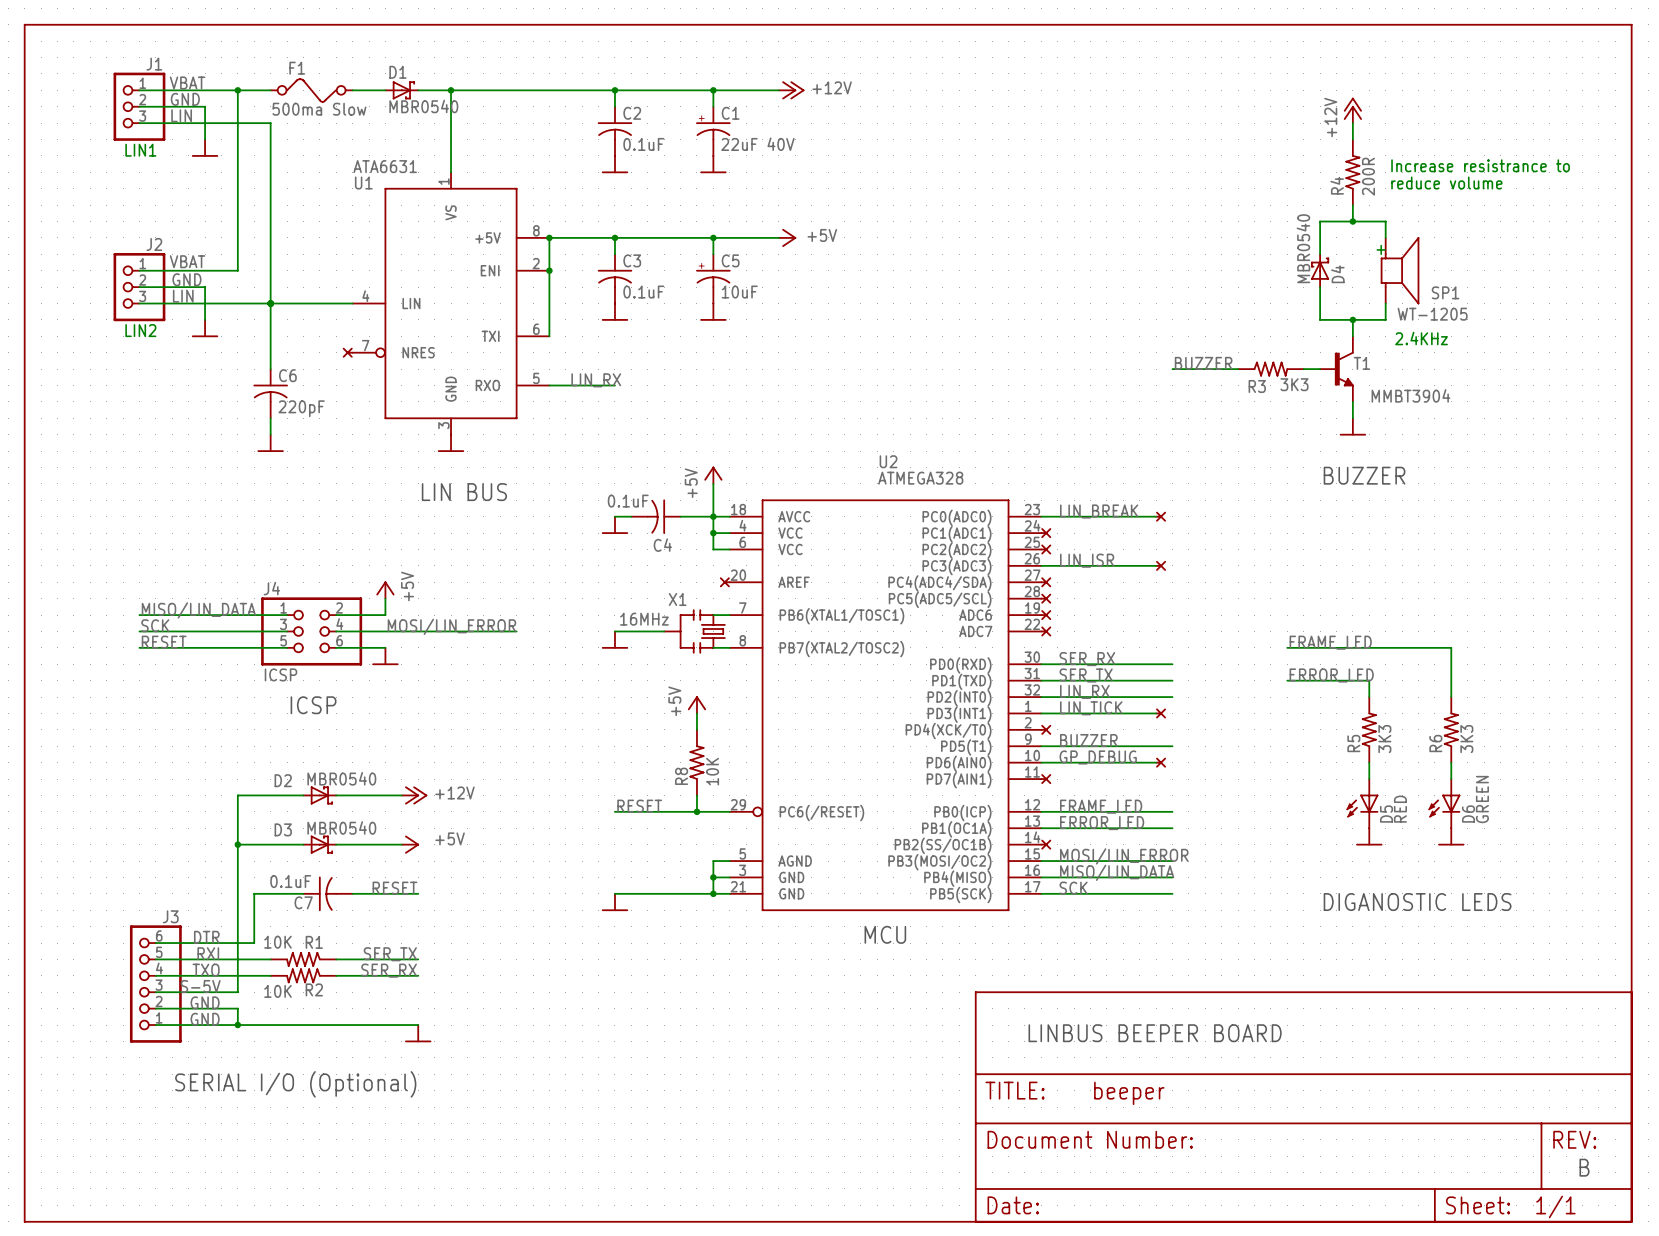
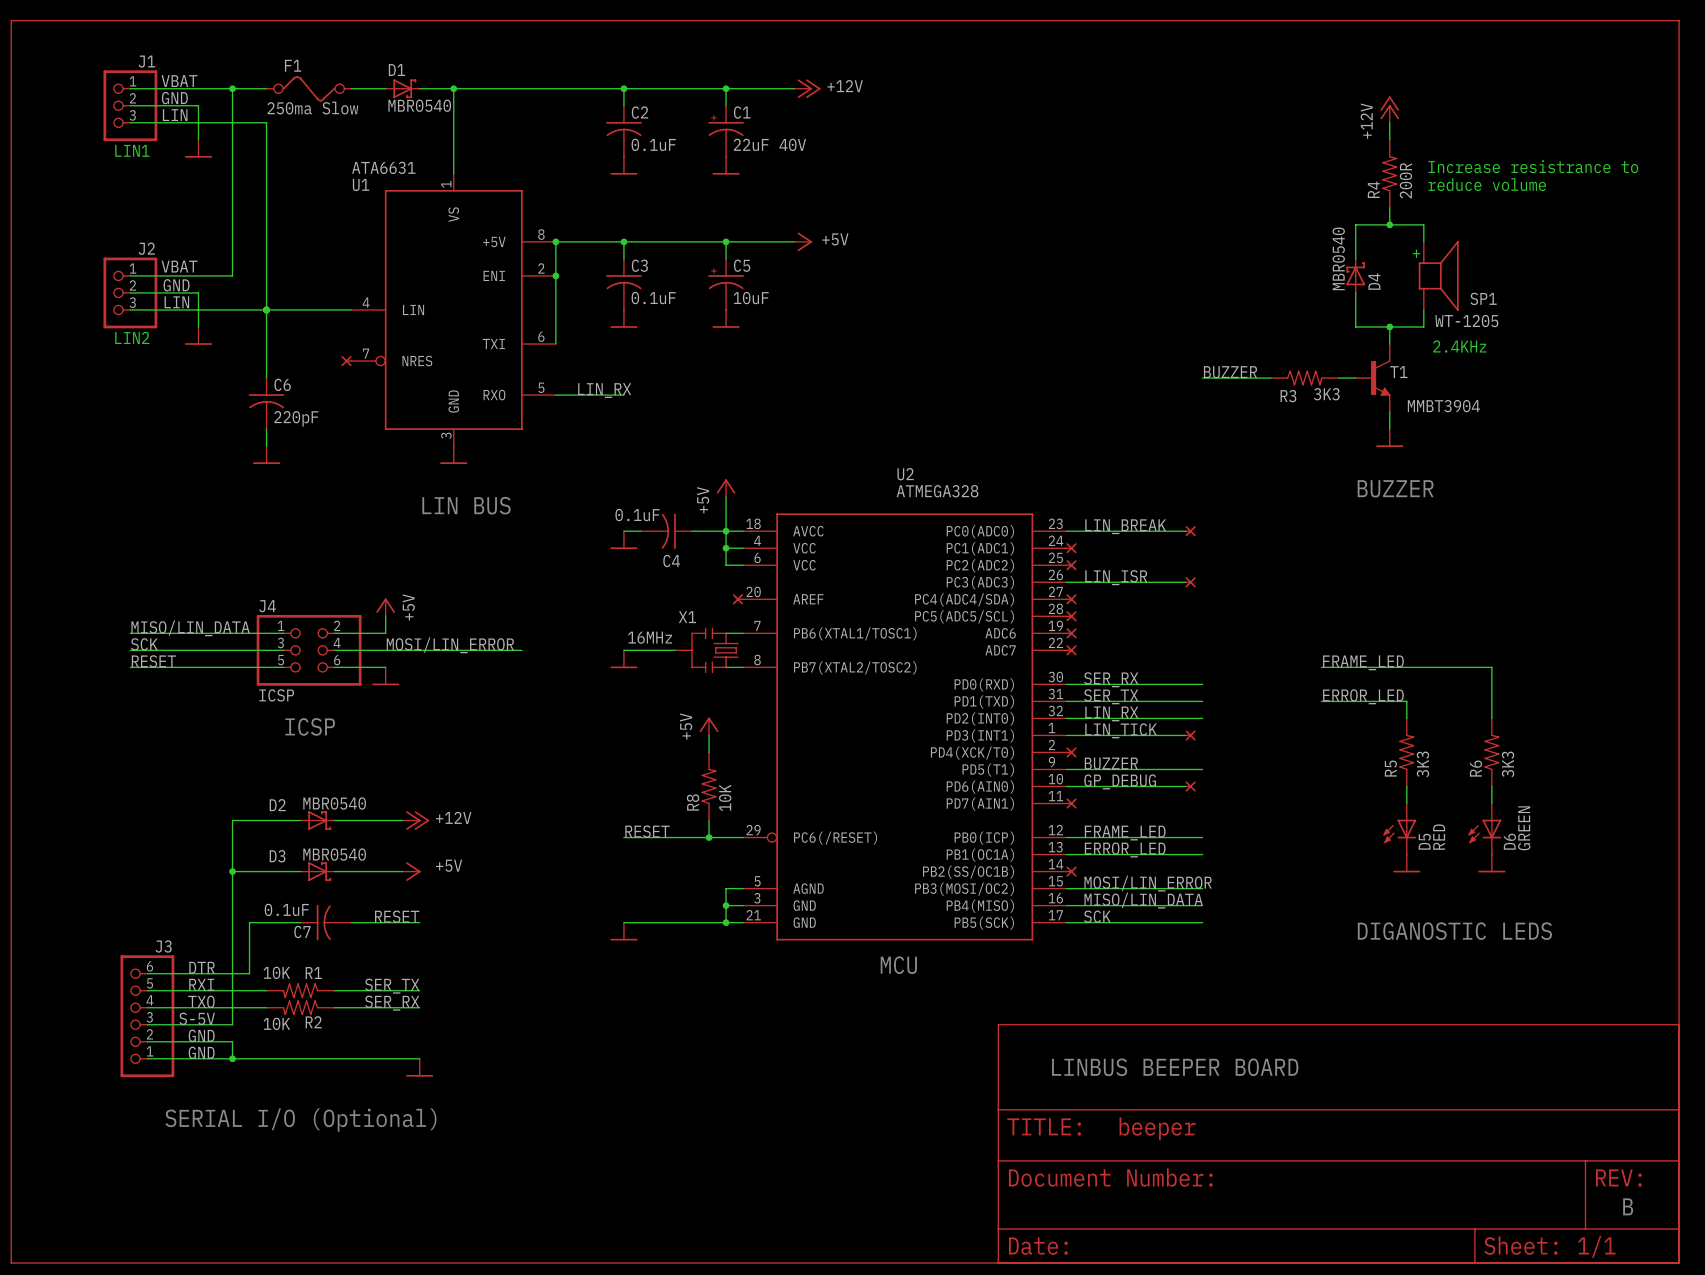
F1 value: 500ma Slow (319, 109) -> 250ma Slow (312, 108)

